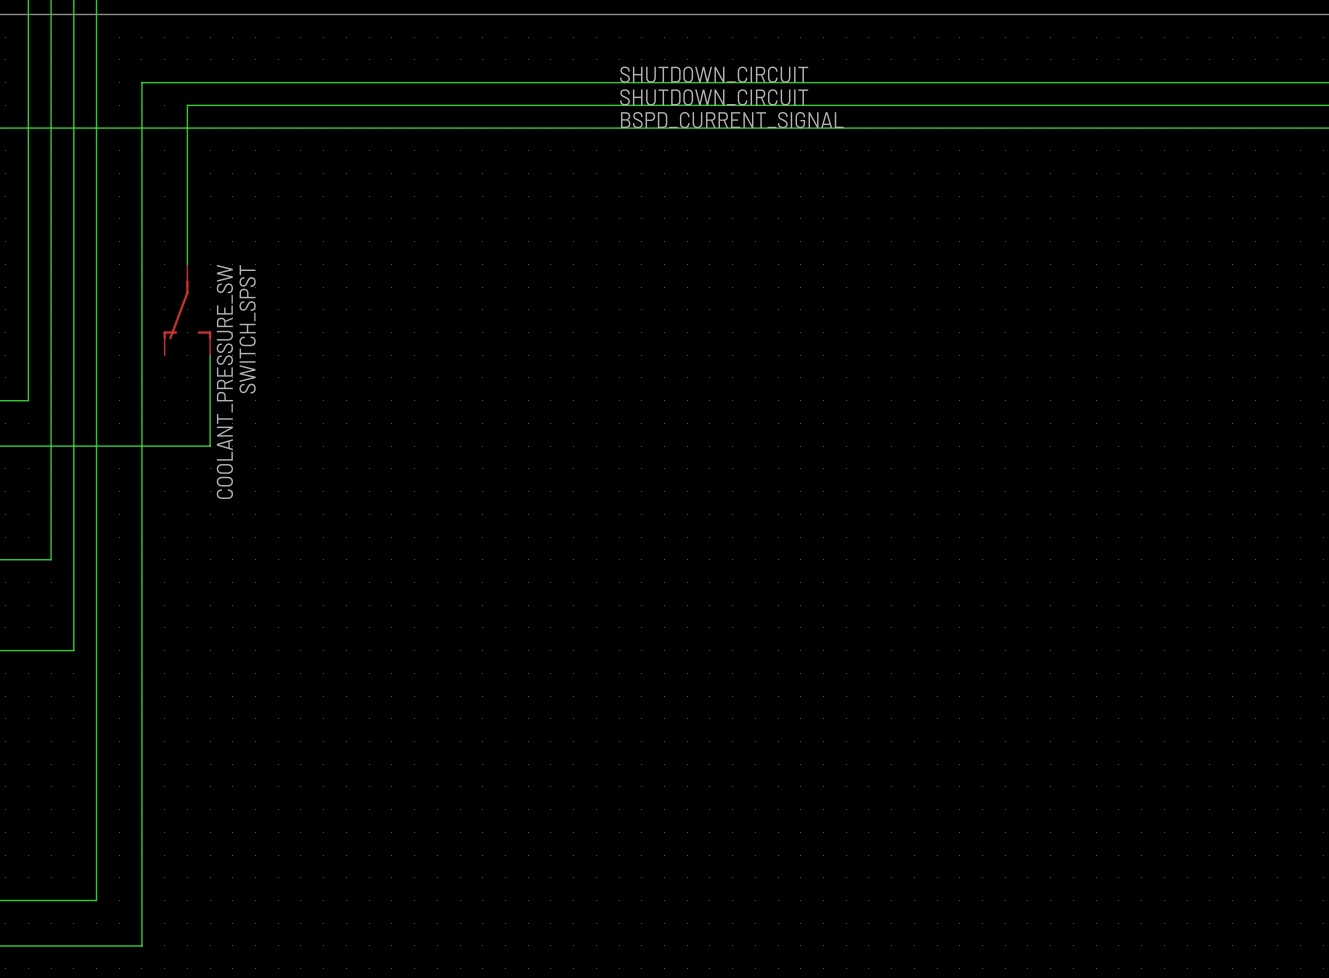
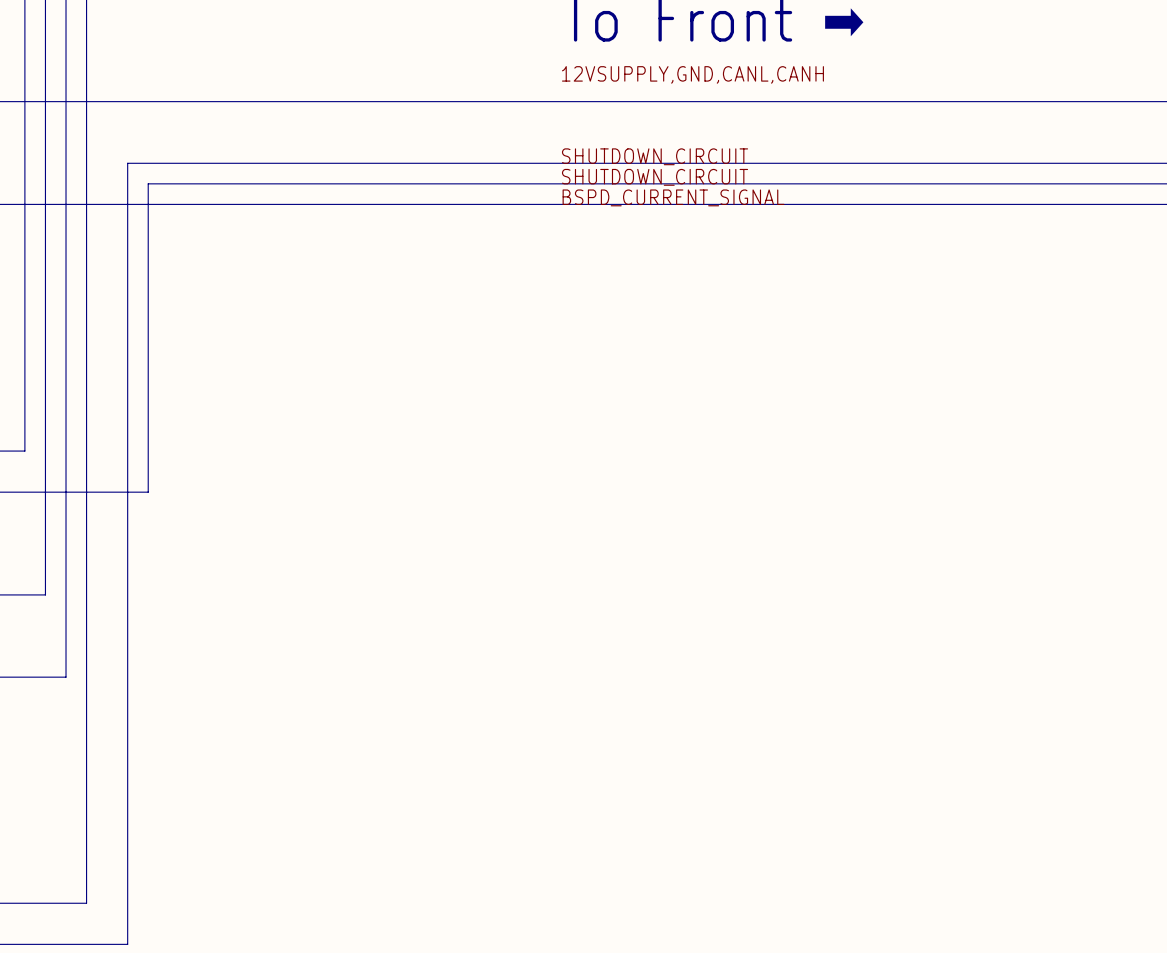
wire: (187, 105) (187, 264) -> (168, 183) (148, 183) (148, 492)
COOLANT_PRESSURE_SW: SWITCH_SPST (187, 309) -> none
wire: (210, 355) (210, 446) (164, 446) -> none

